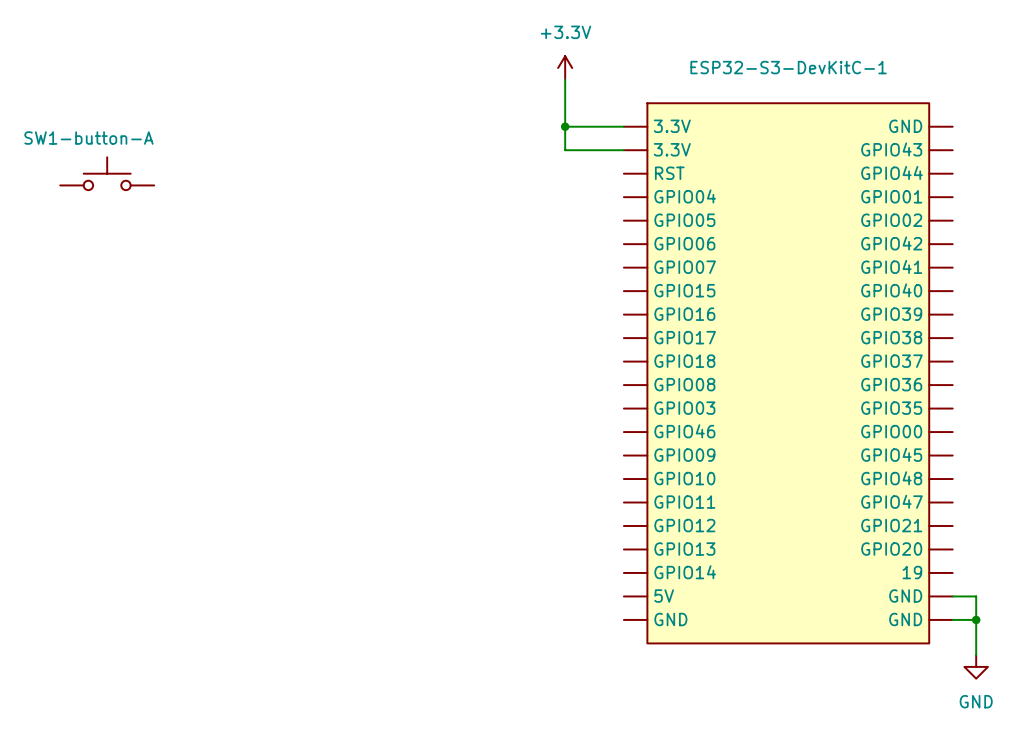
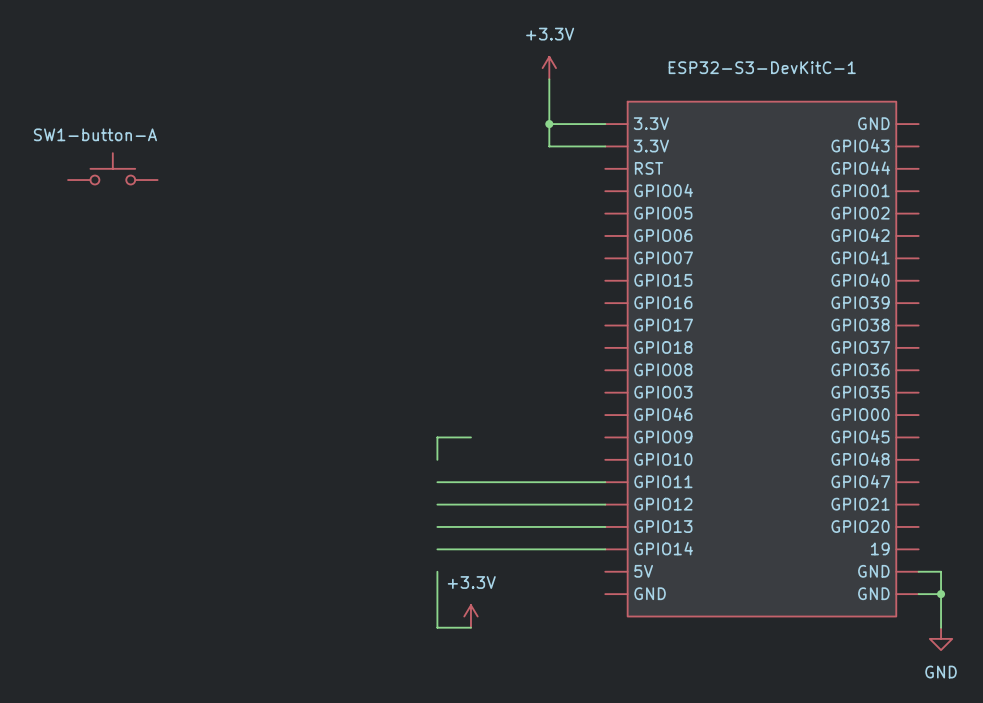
wire: none -> (470, 437) (437, 437) (437, 459)
wire: none -> (437, 482) (605, 482)
wire: none -> (437, 504) (605, 504)
wire: none -> (437, 526) (605, 526)
wire: none -> (437, 549) (605, 549)
wire: none -> (437, 571) (437, 627) (470, 627)
power symbol: none -> +3.3V (470, 616)

